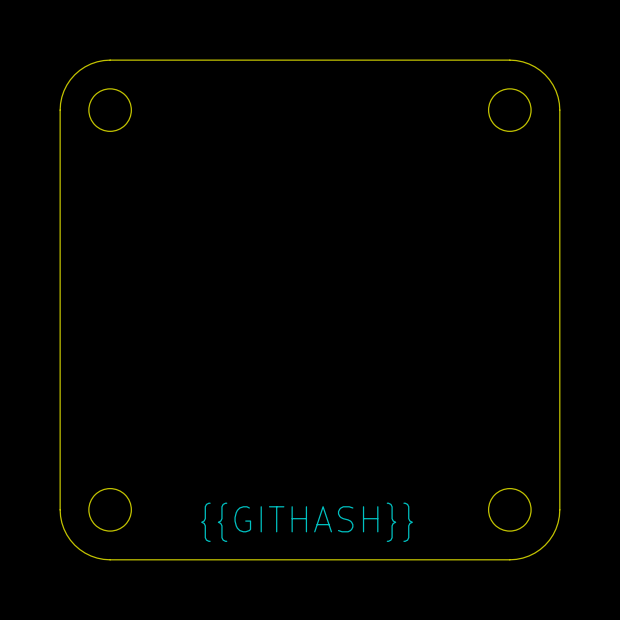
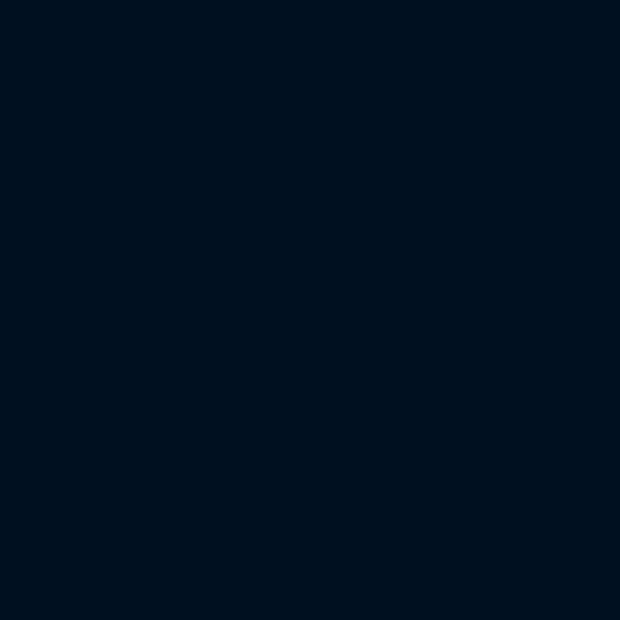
board edge: (110, 60) (509, 60) (528, 63) (545, 74) (556, 90) (559, 110) (559, 509) (556, 528) (545, 545) (528, 556) (509, 559) (110, 559) (90, 556) (74, 545) (63, 528) (60, 509) (60, 103) (66, 85) (74, 74) (90, 63) (110, 60) -> none
round board edge: [88, 88, 132, 132] -> none
round board edge: [487, 88, 532, 132] -> none
round board edge: [88, 487, 132, 532] -> none
round board edge: [487, 487, 532, 532] -> none
text: {{GITHASH}} (307, 522) -> none

